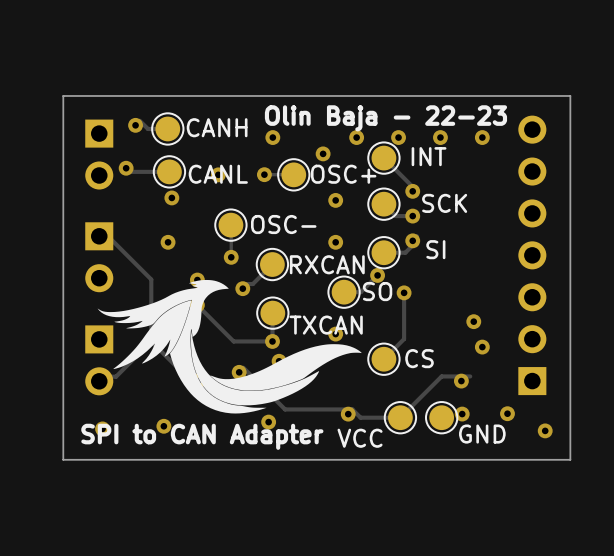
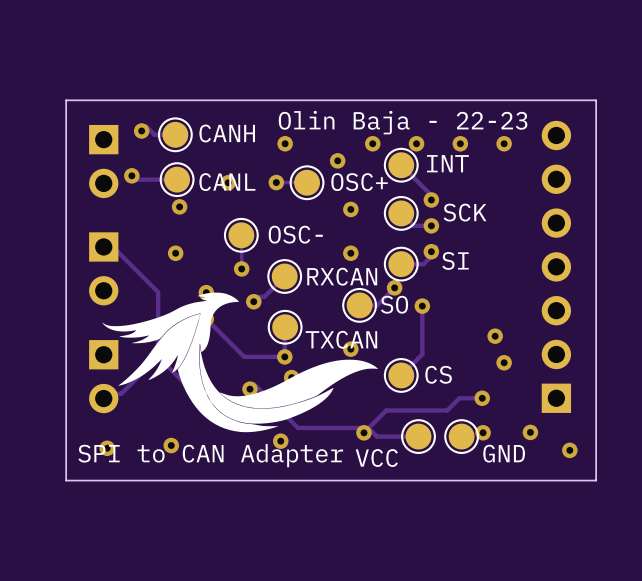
track: (470, 376) (441, 376) (400, 417) -> none
track: none -> (482, 398) (459, 398) (447, 410) (386, 410) (363, 432)

